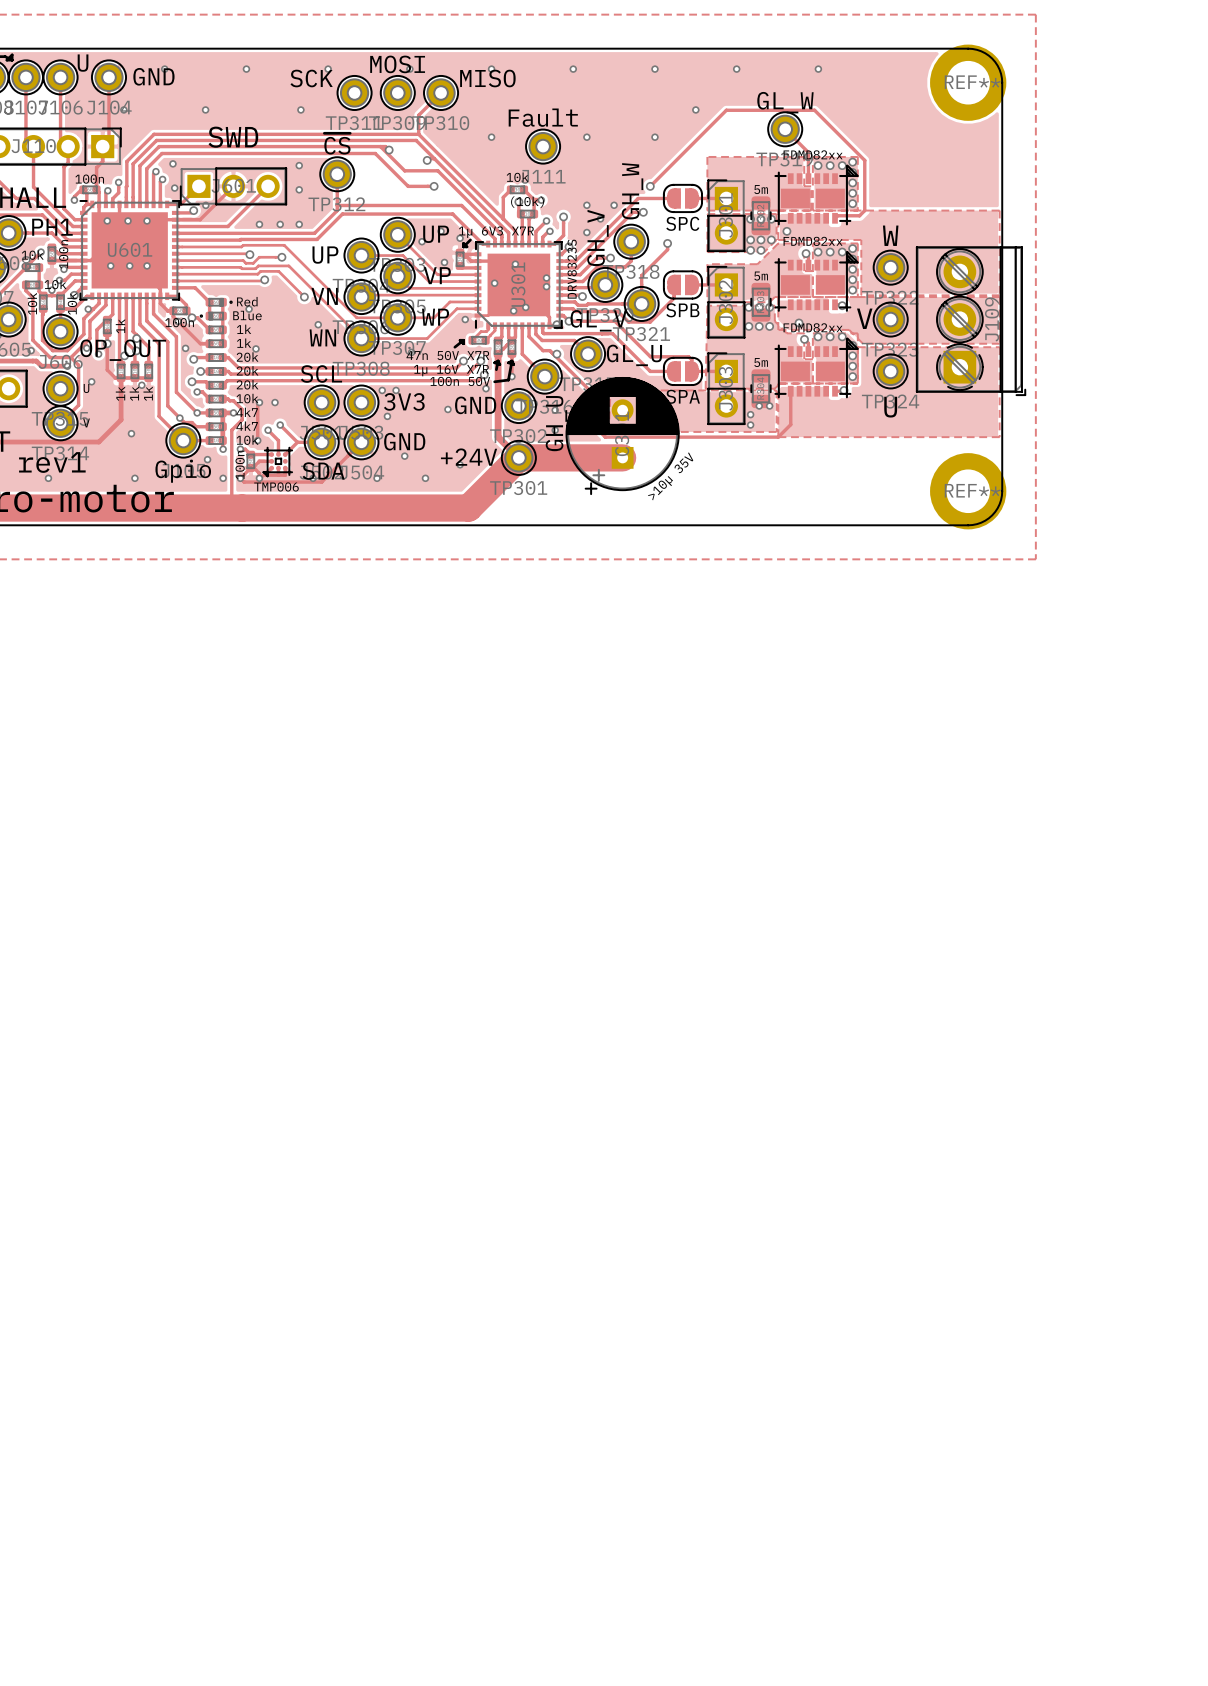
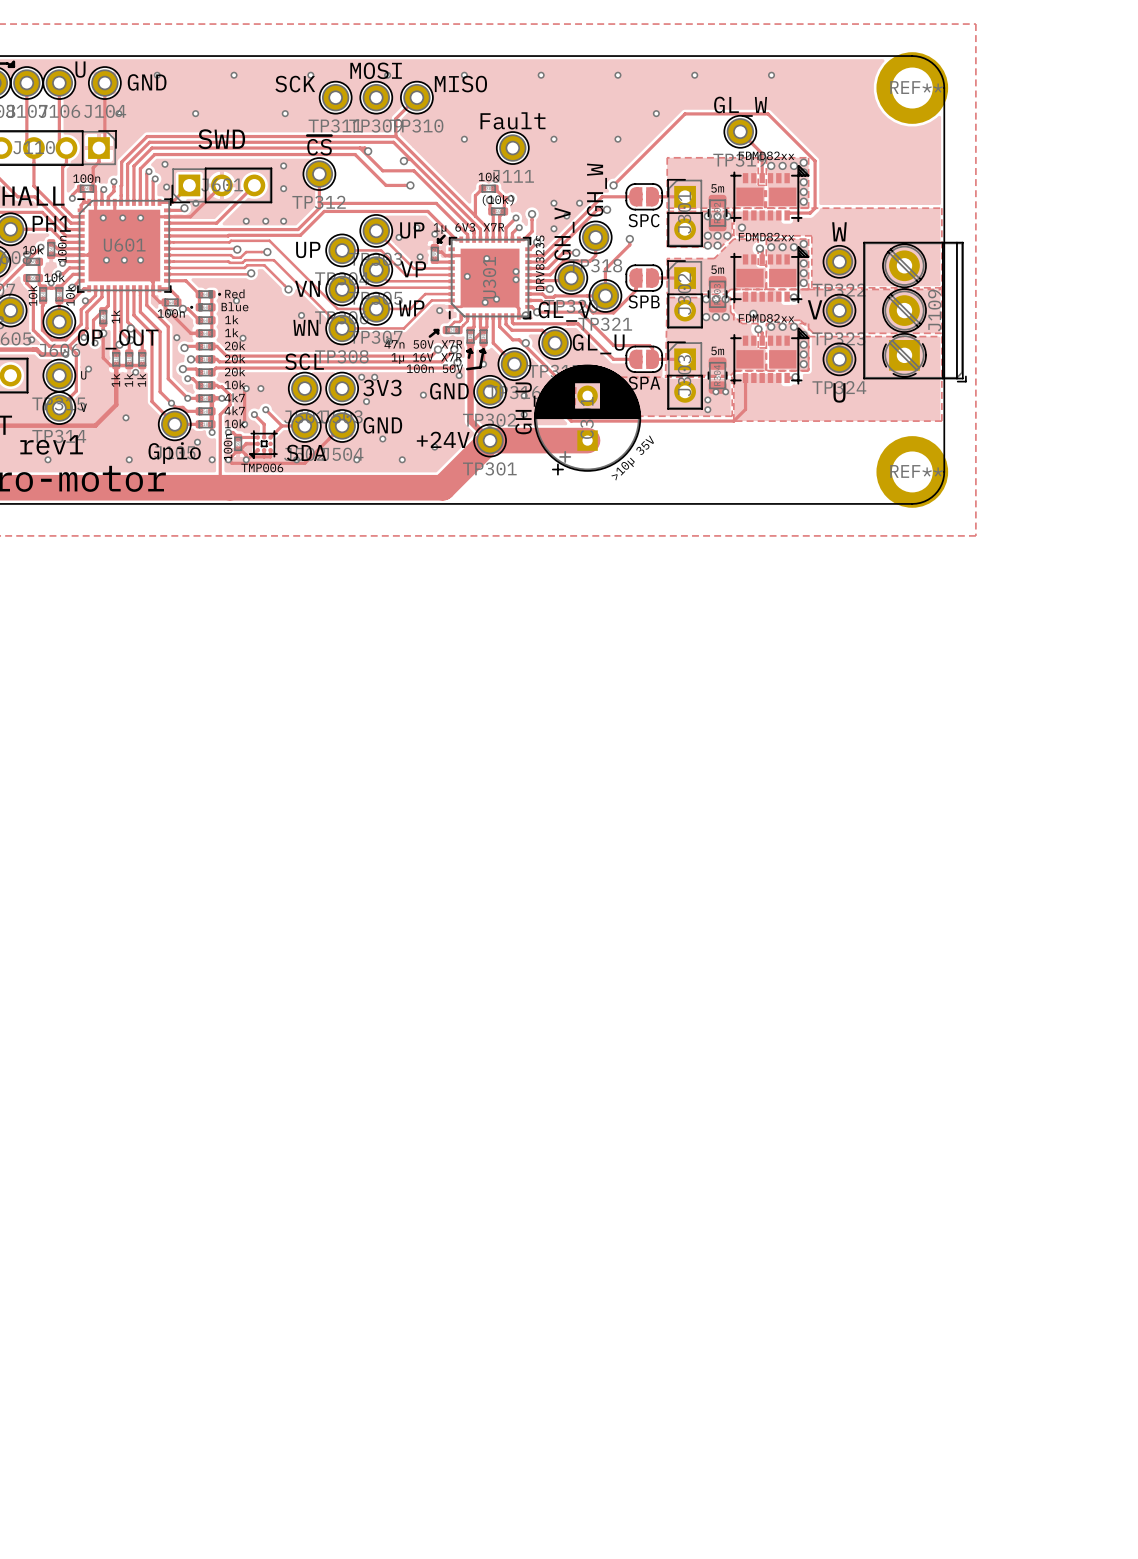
track: (461, 254) (478, 254) -> none

